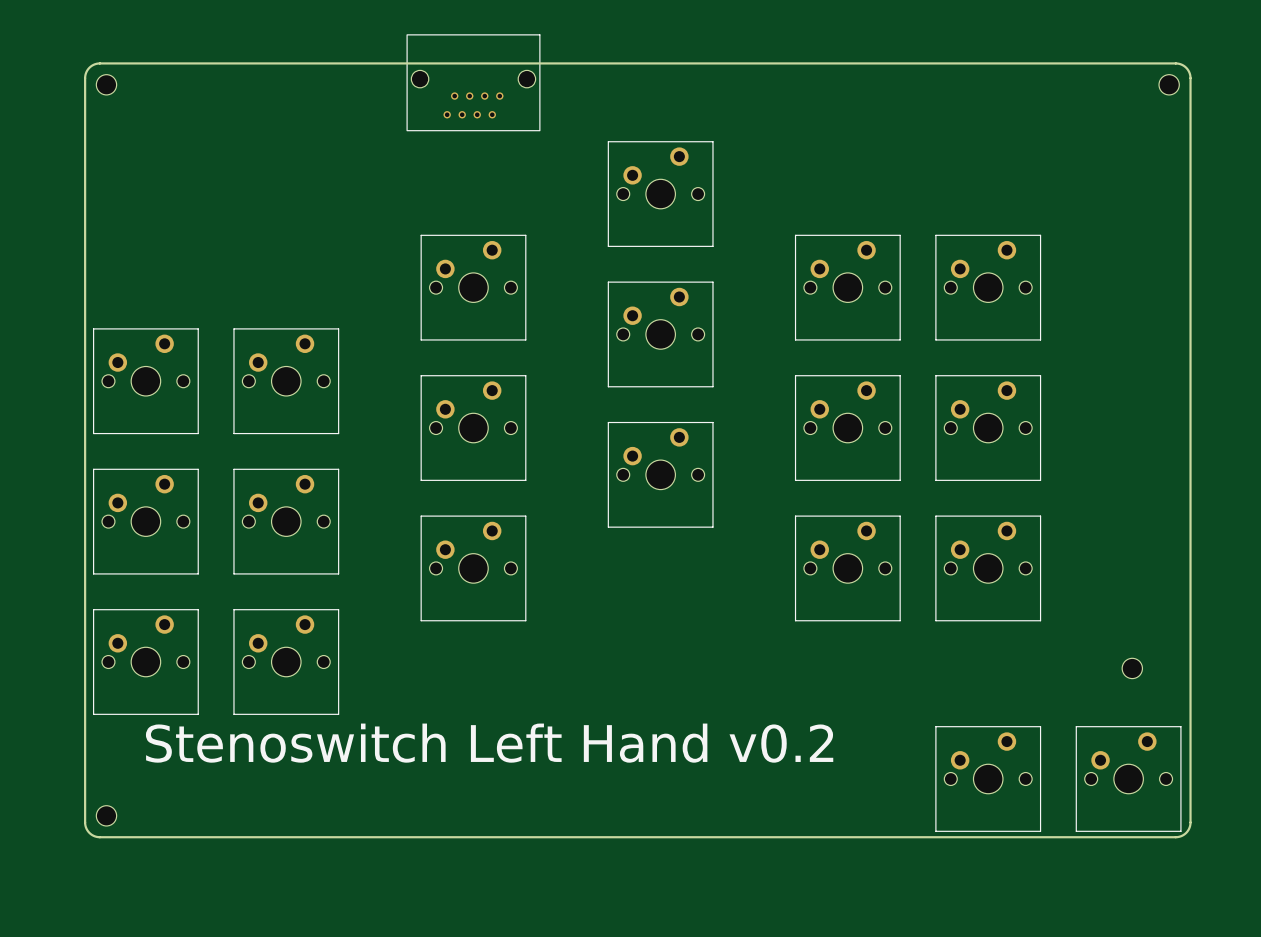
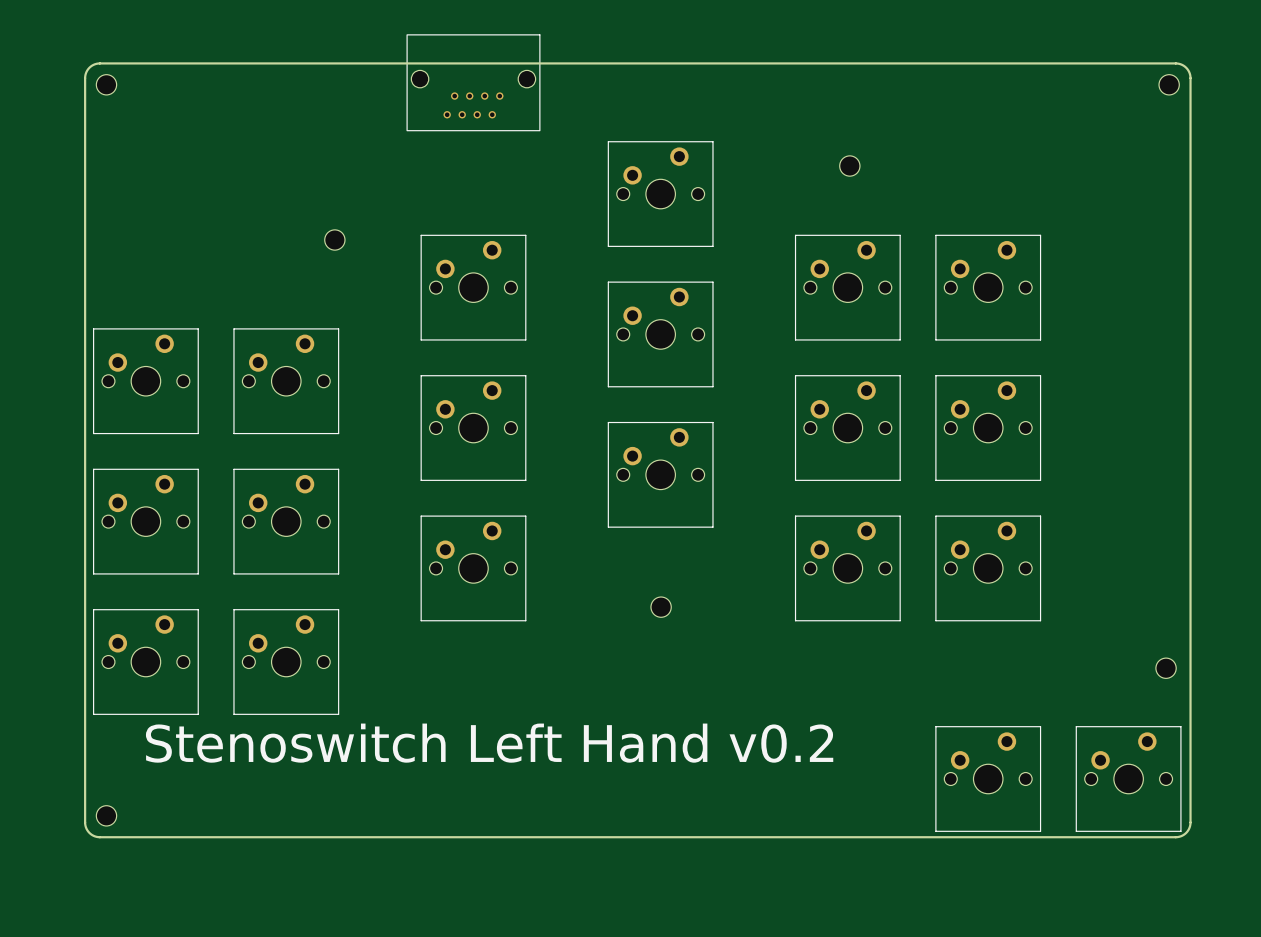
part: none -> (849, 166)
part: none -> (334, 240)
part: none -> (661, 607)
part position: (1132, 668) -> (1166, 668)

